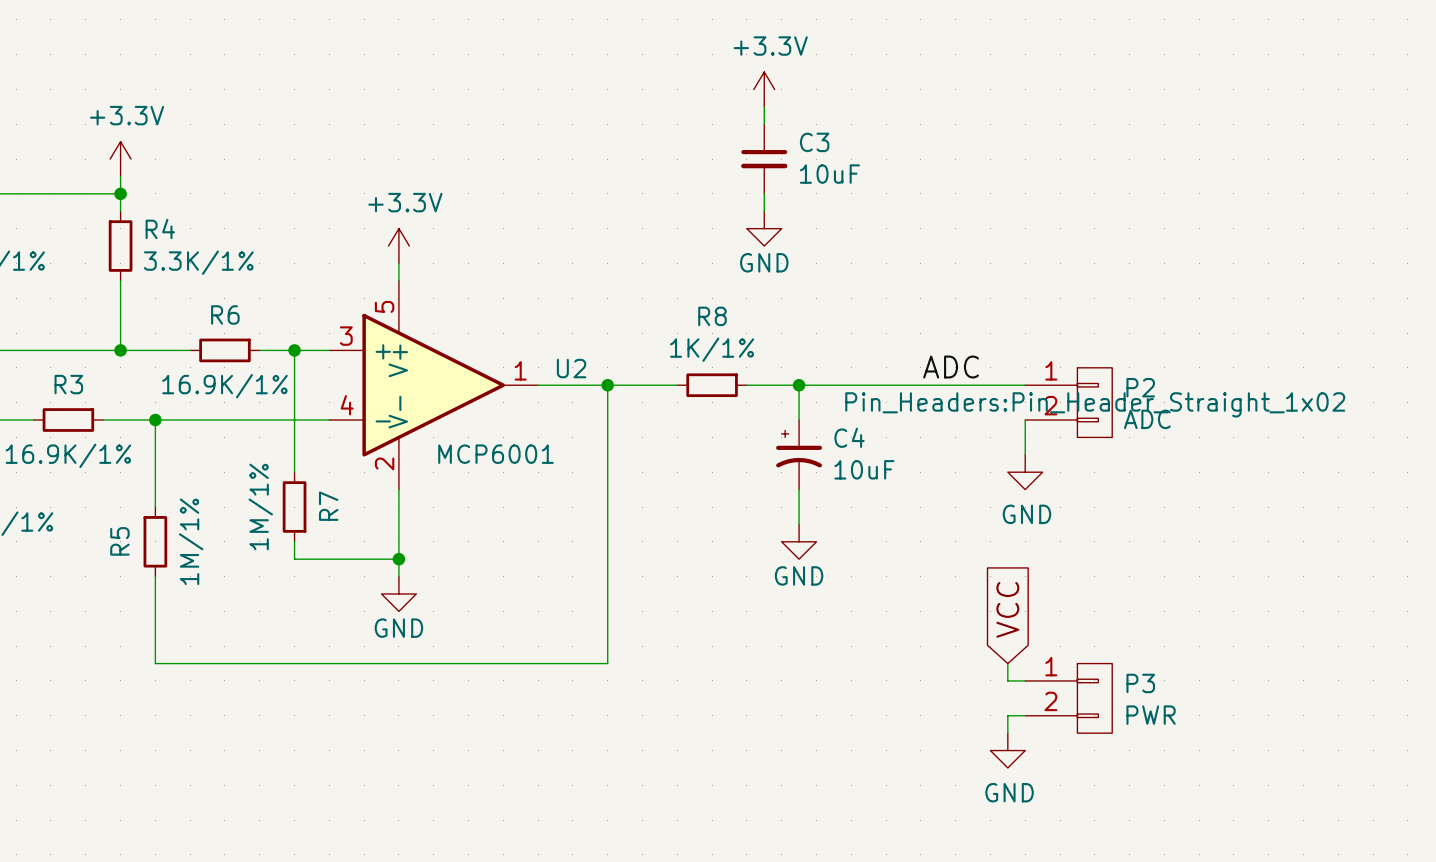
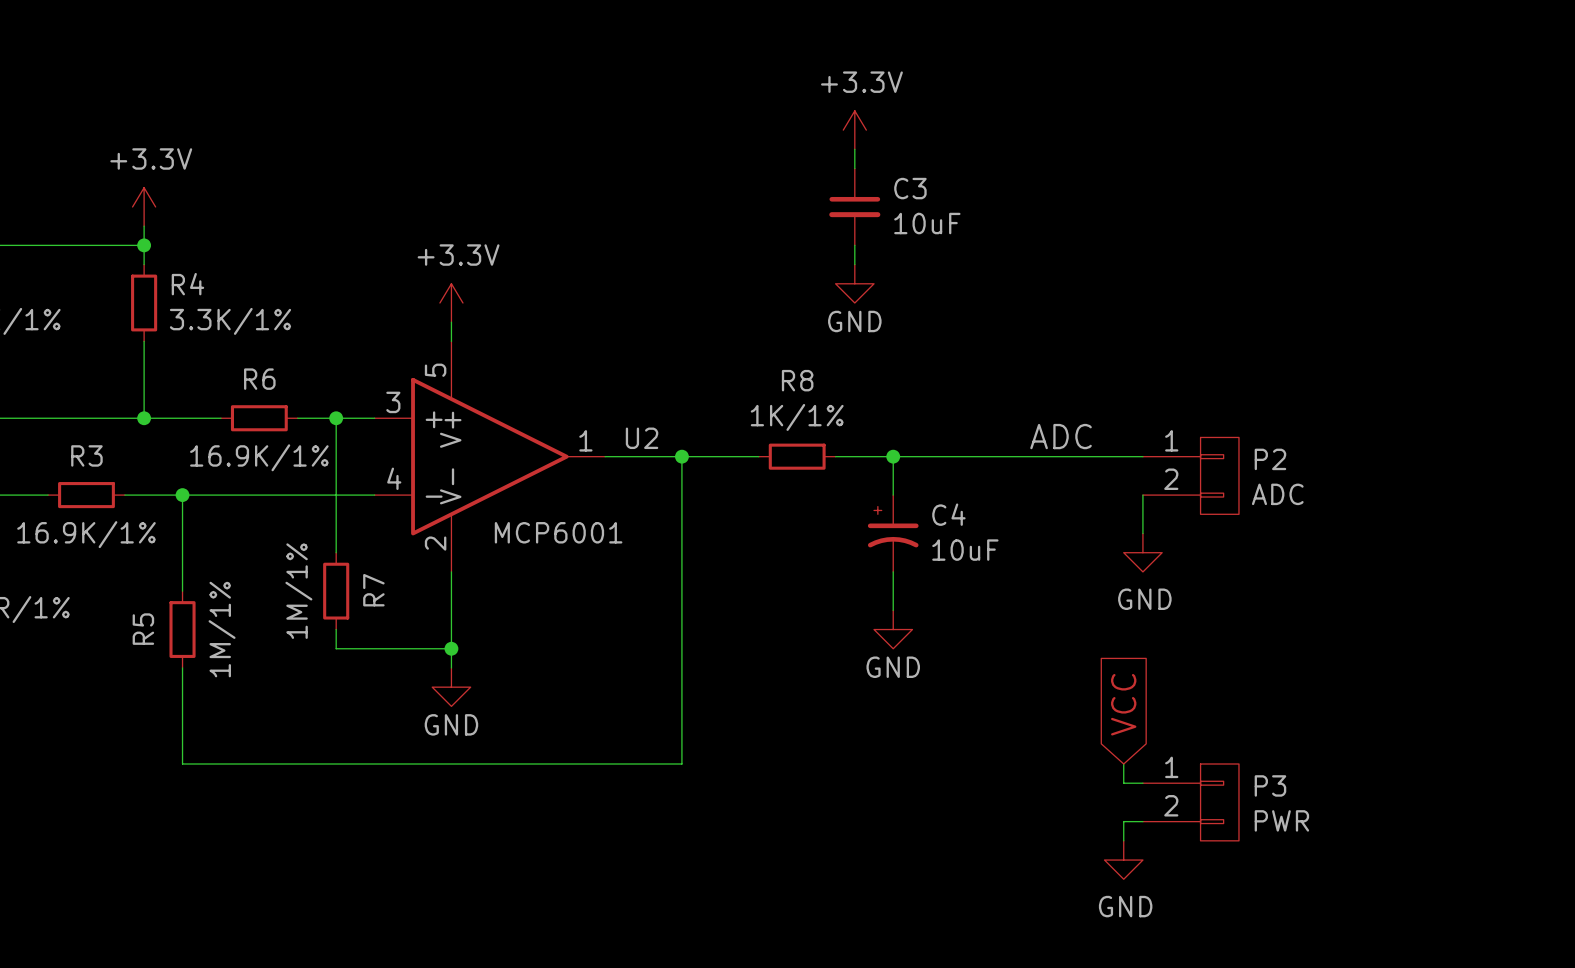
P2 text: Pin_Headers:Pin_Header_Straight_1x02 (1095, 404) -> none

